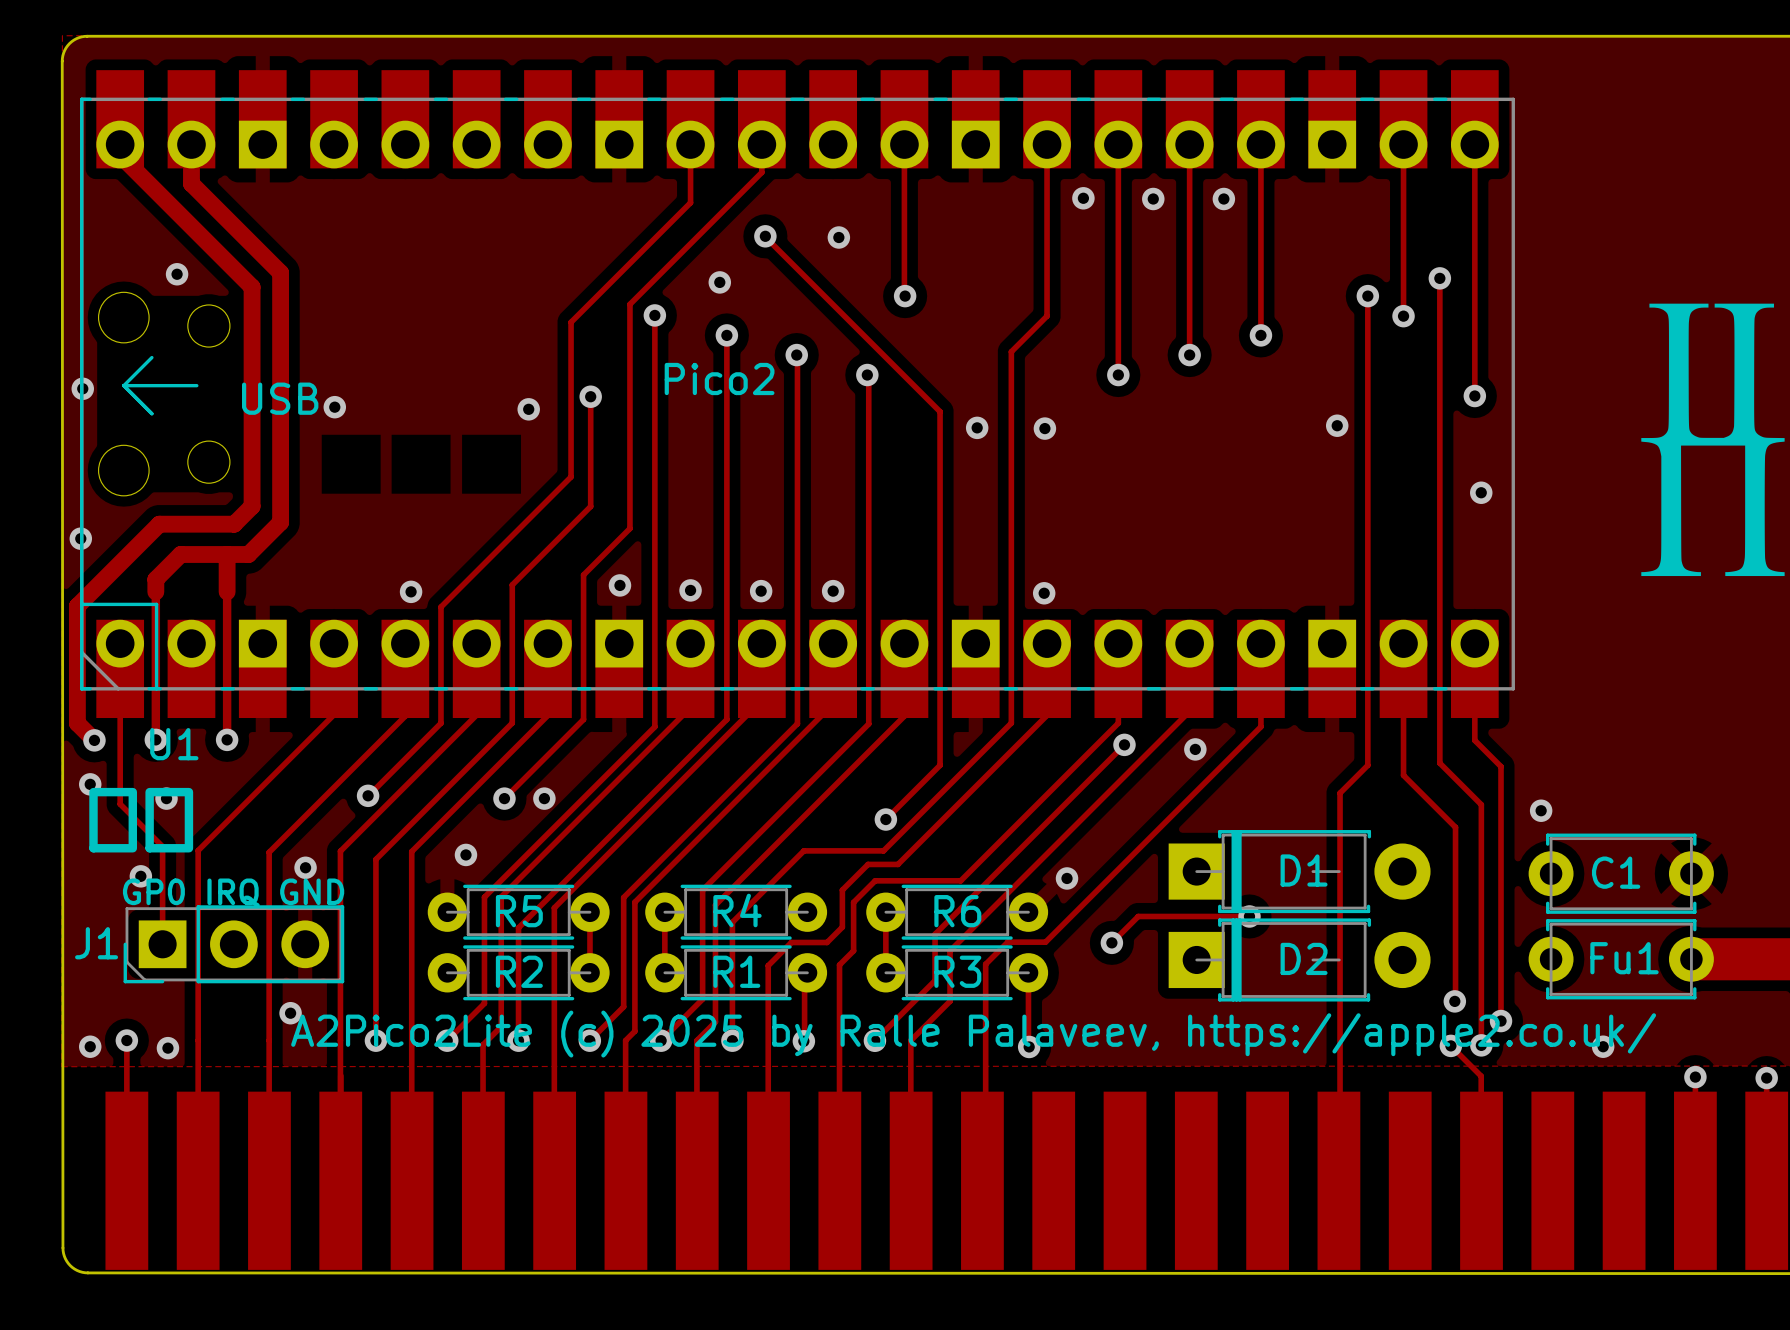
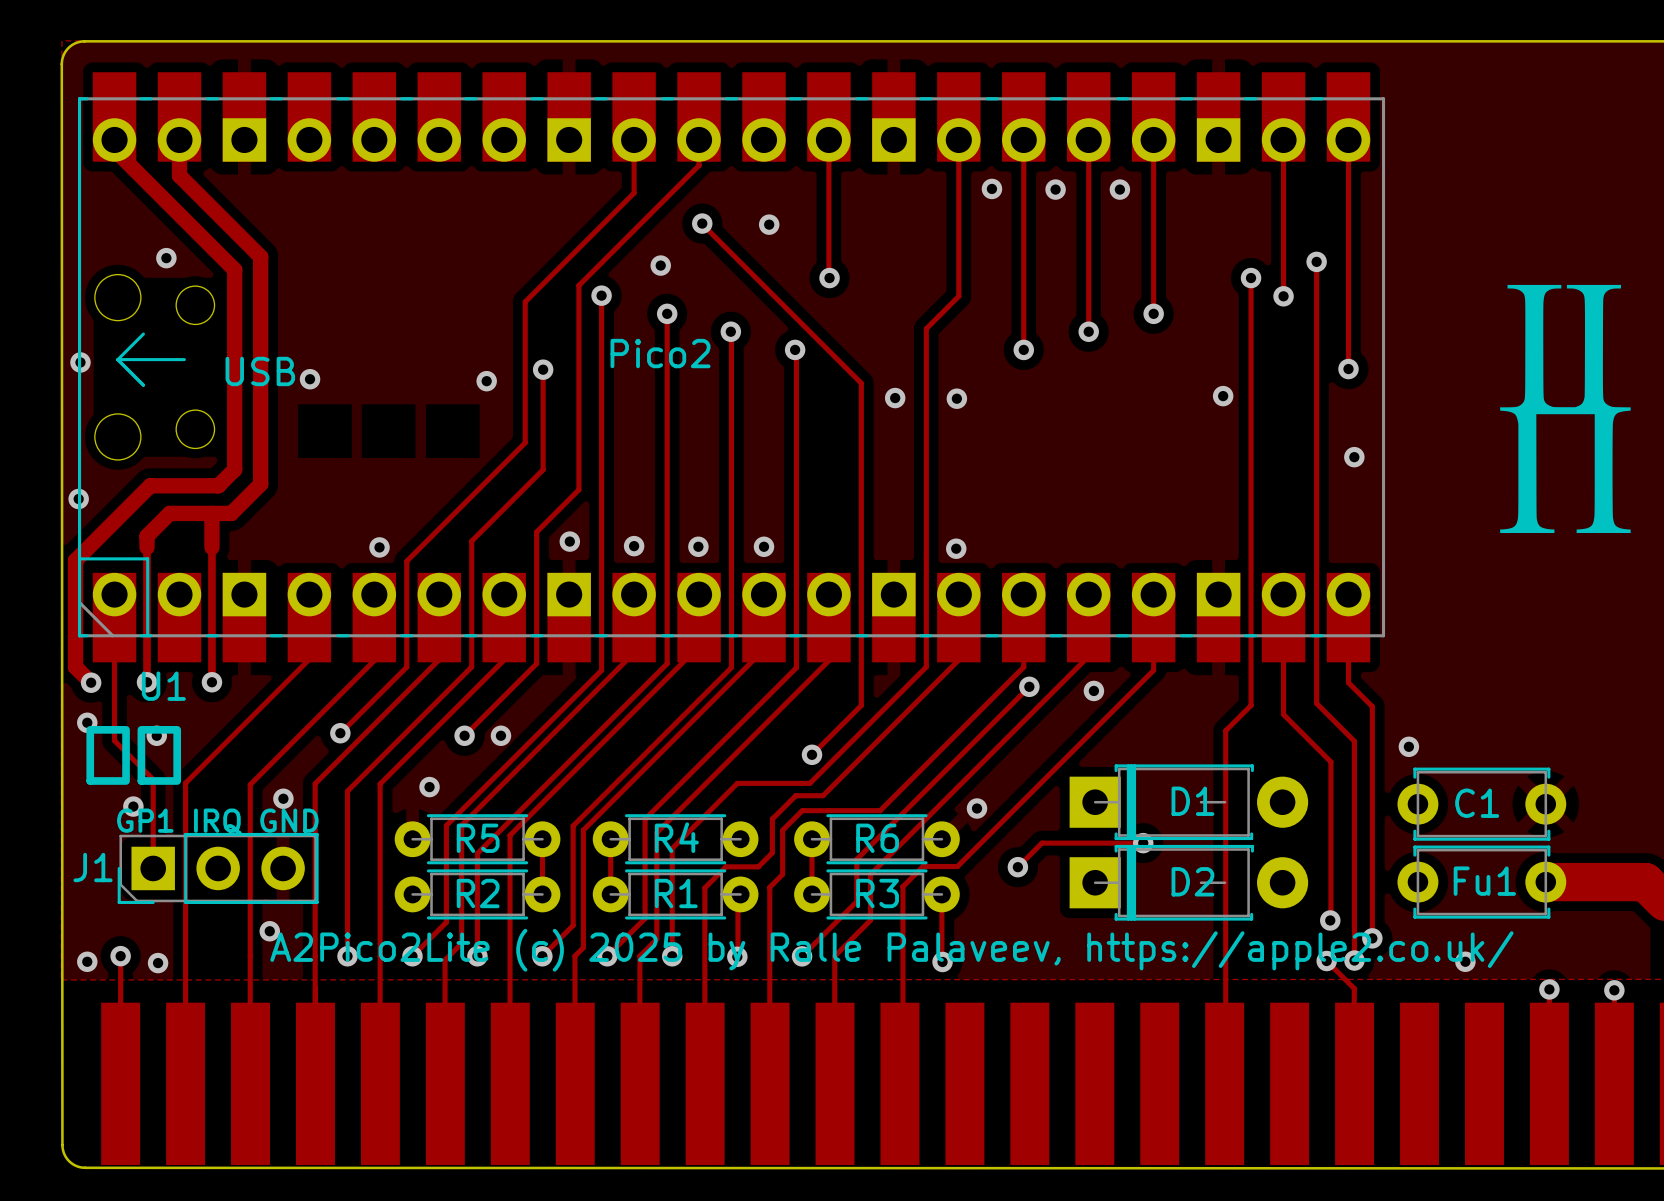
text: GP0 IRQ GND (233, 892) -> GP1 IRQ GND (217, 821)

